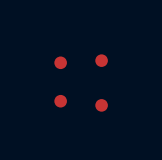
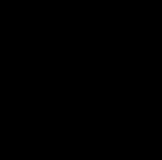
part: (101, 60) -> none
part: (60, 62) -> none
part: (60, 101) -> none
part: (101, 105) -> none

